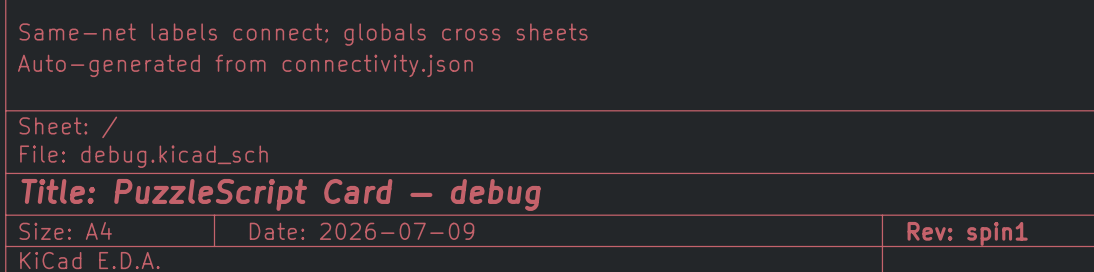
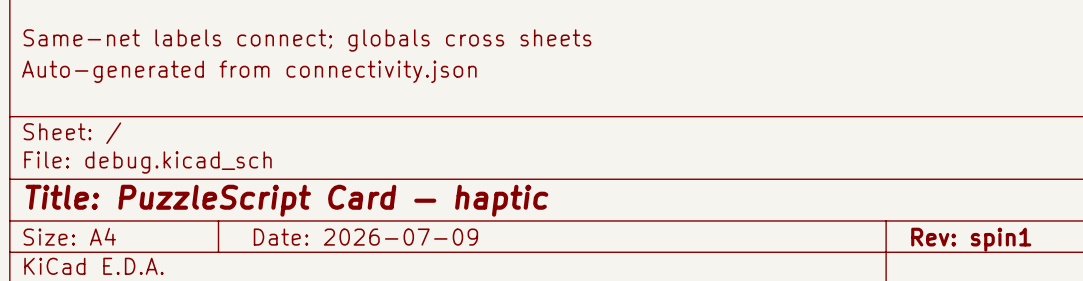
title block: Title: PuzzleScript Card — debug (281, 194) -> Title: PuzzleScript Card — haptic (286, 200)

